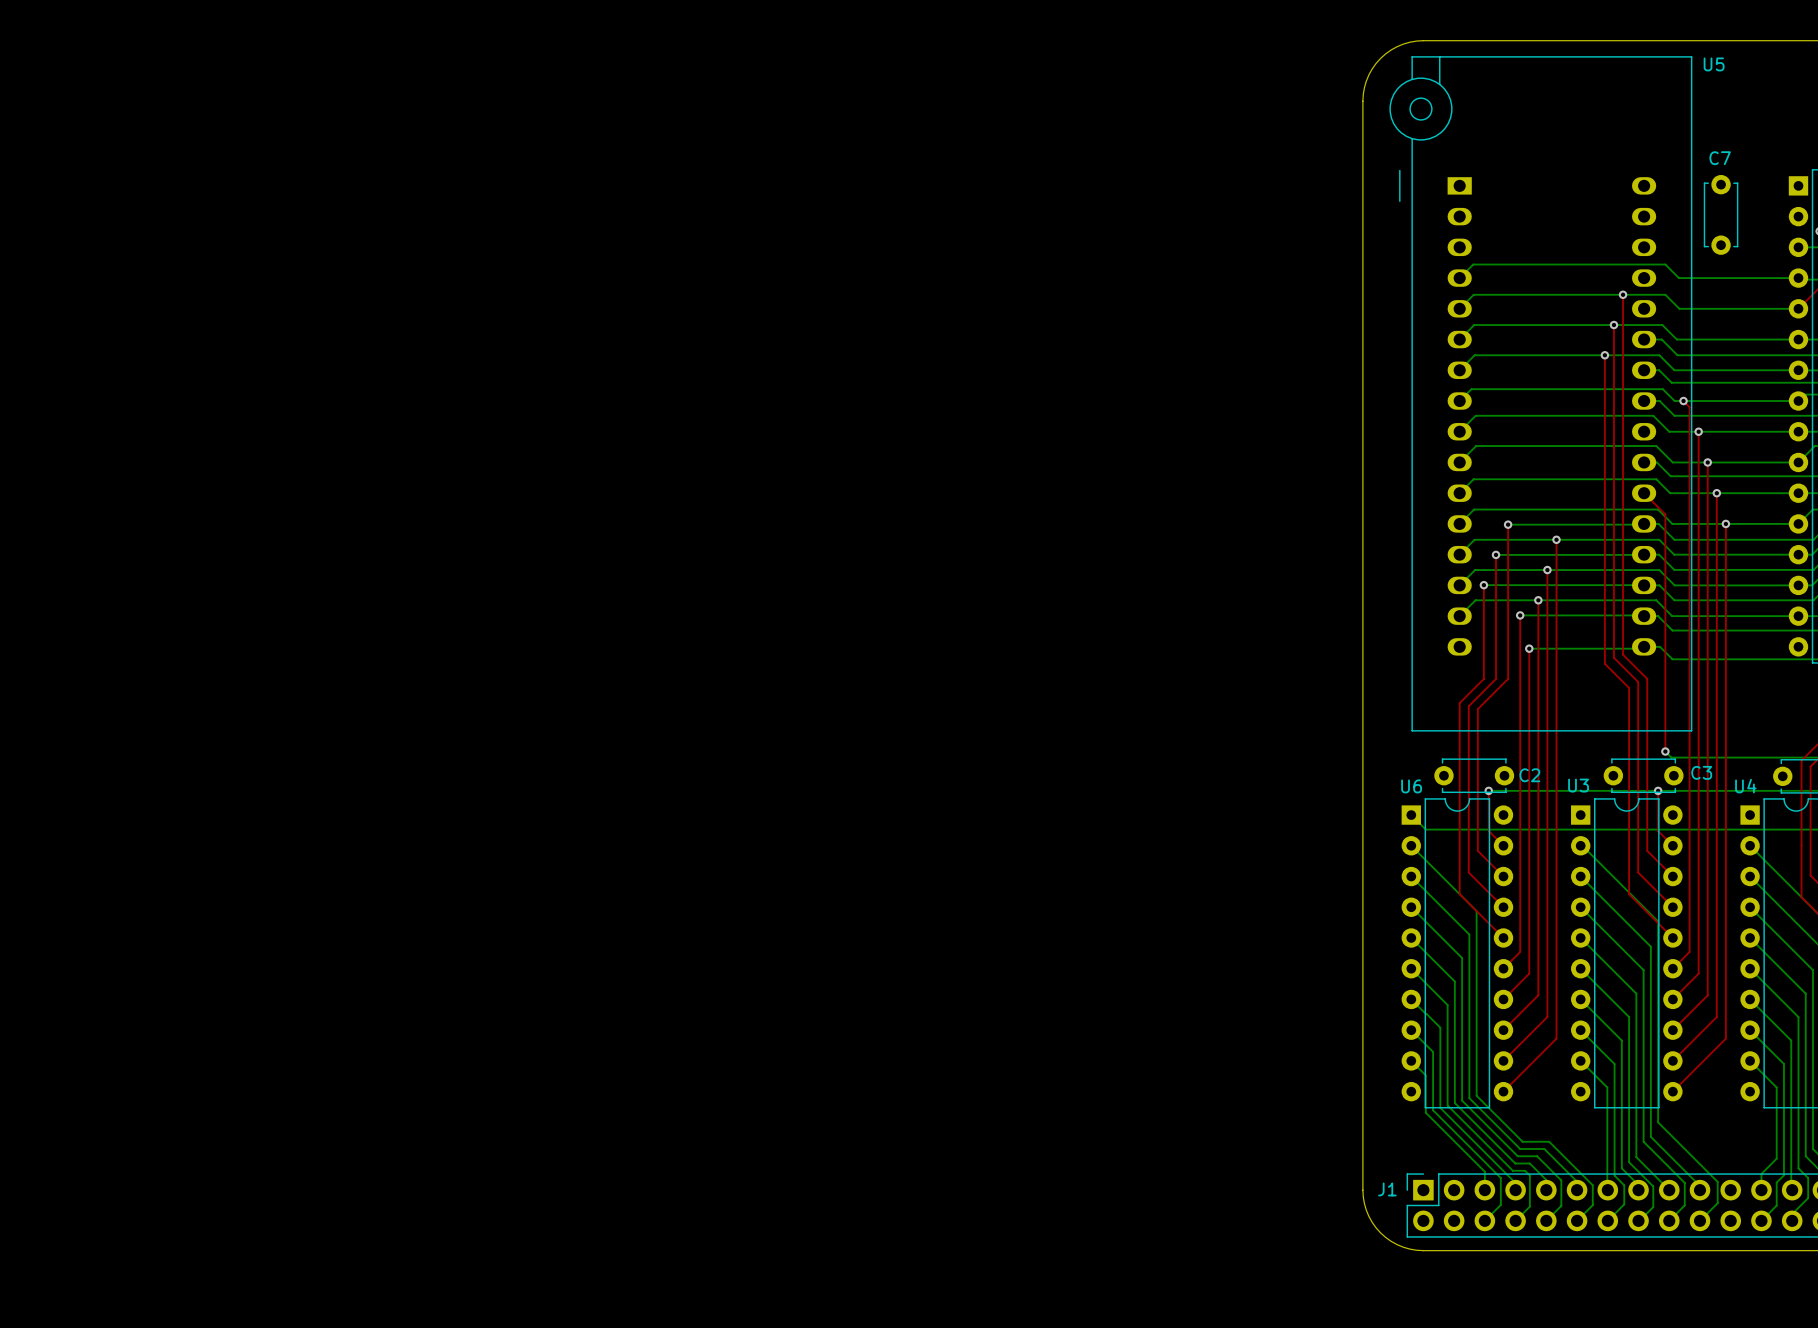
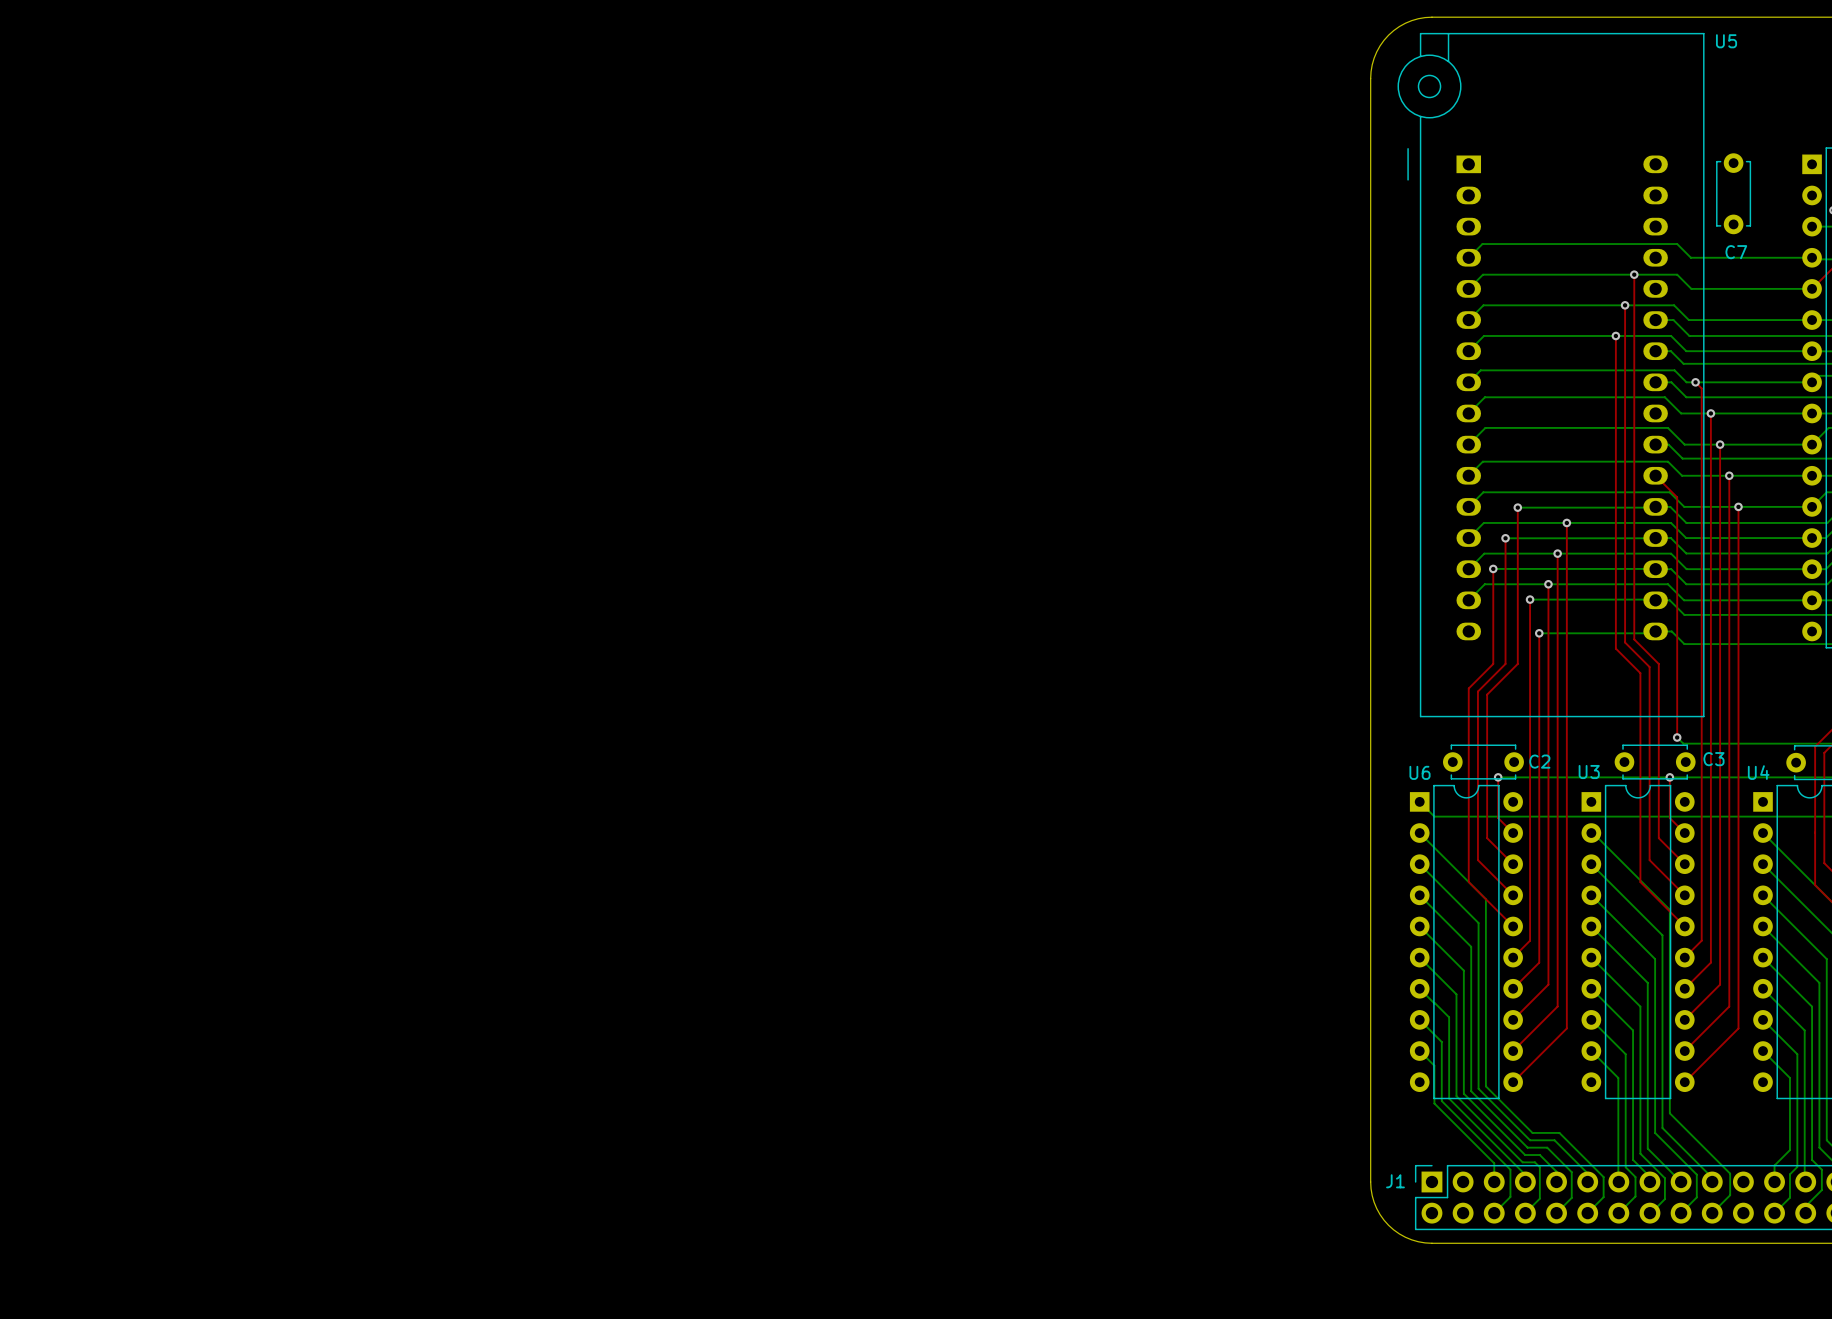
C7 name position: C7 (1720, 158) -> C7 (1736, 252)

